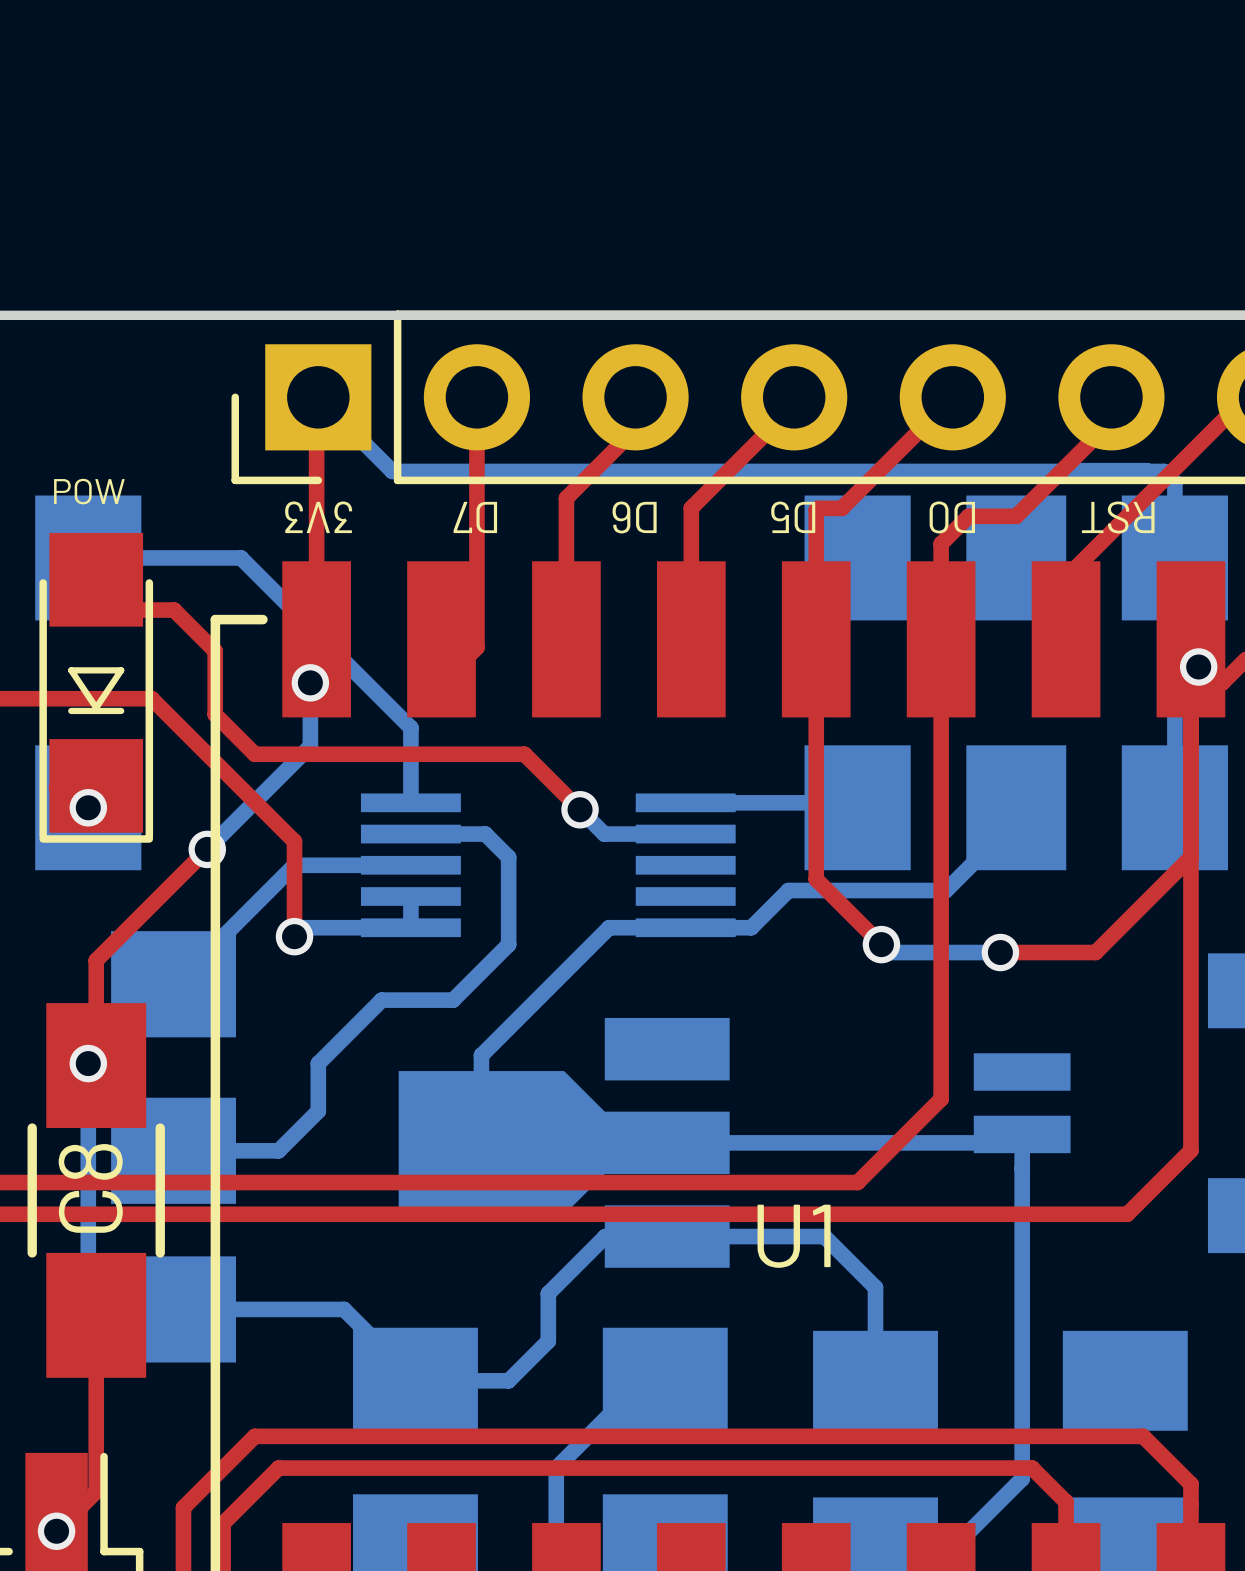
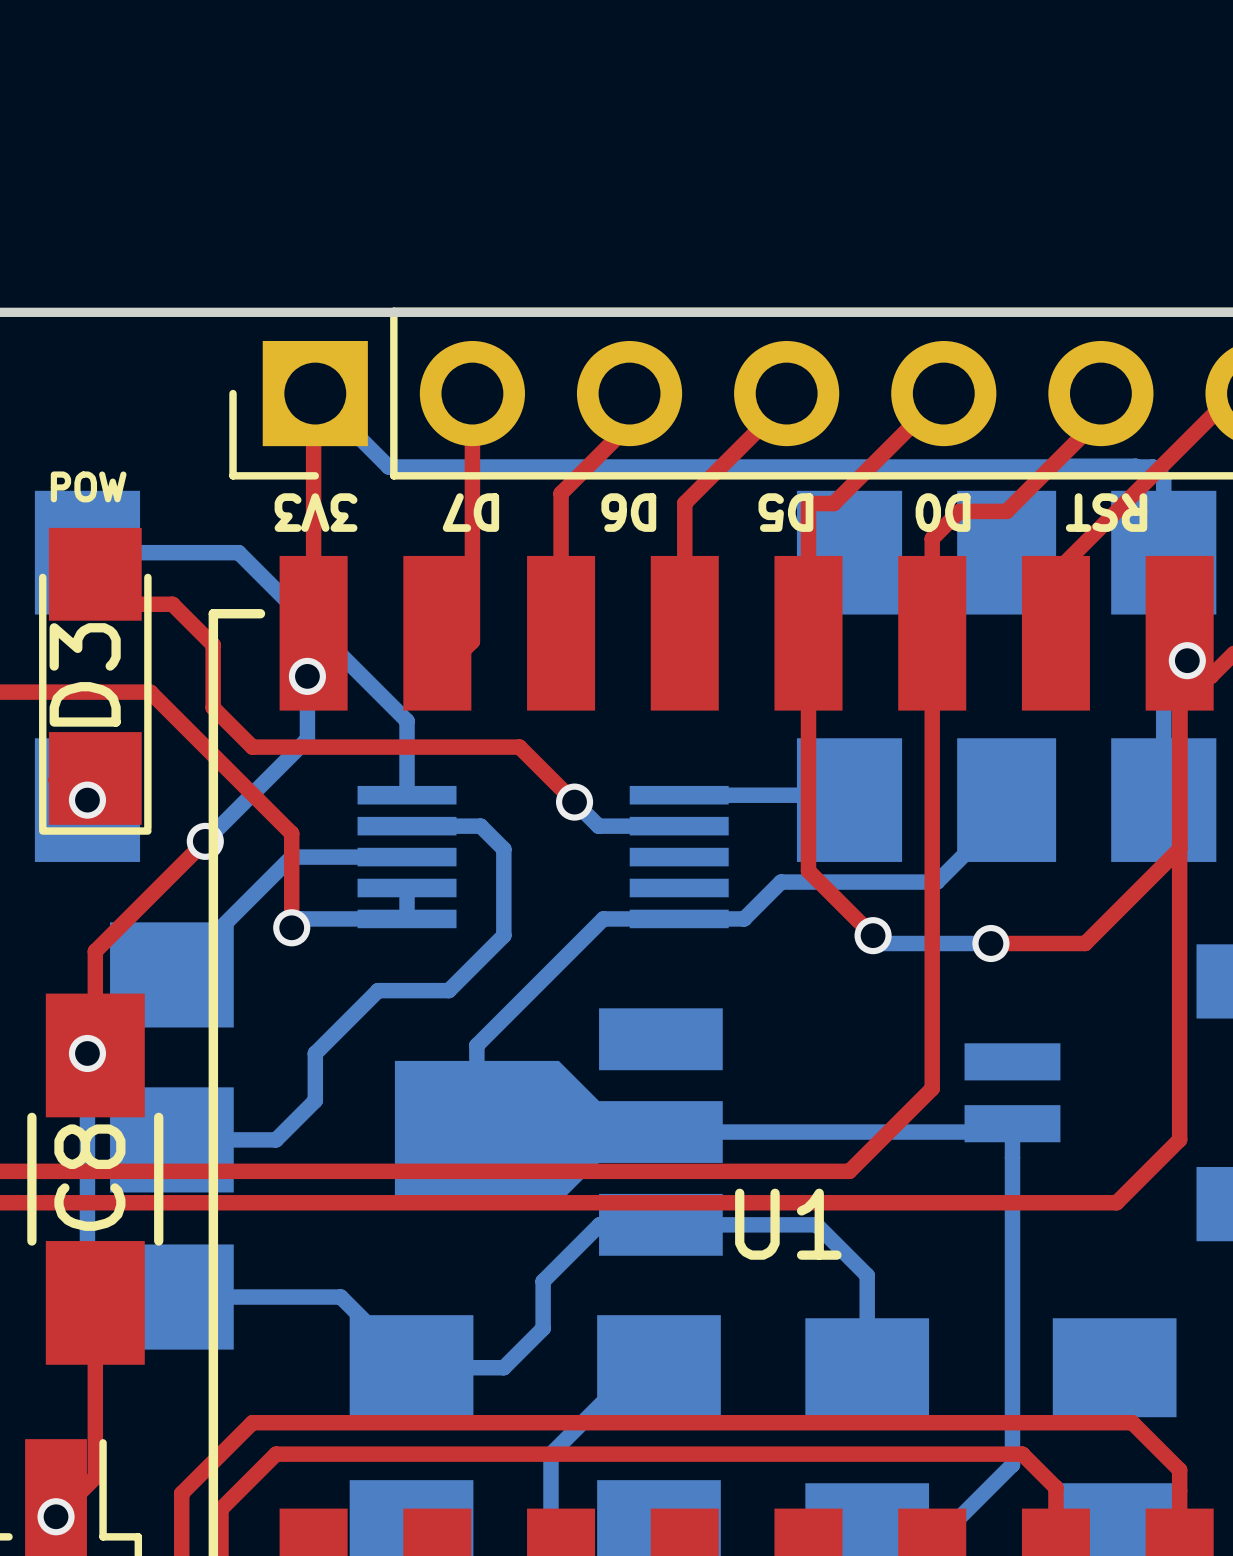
part: (96, 687) -> none
D3: none -> (95, 681)

